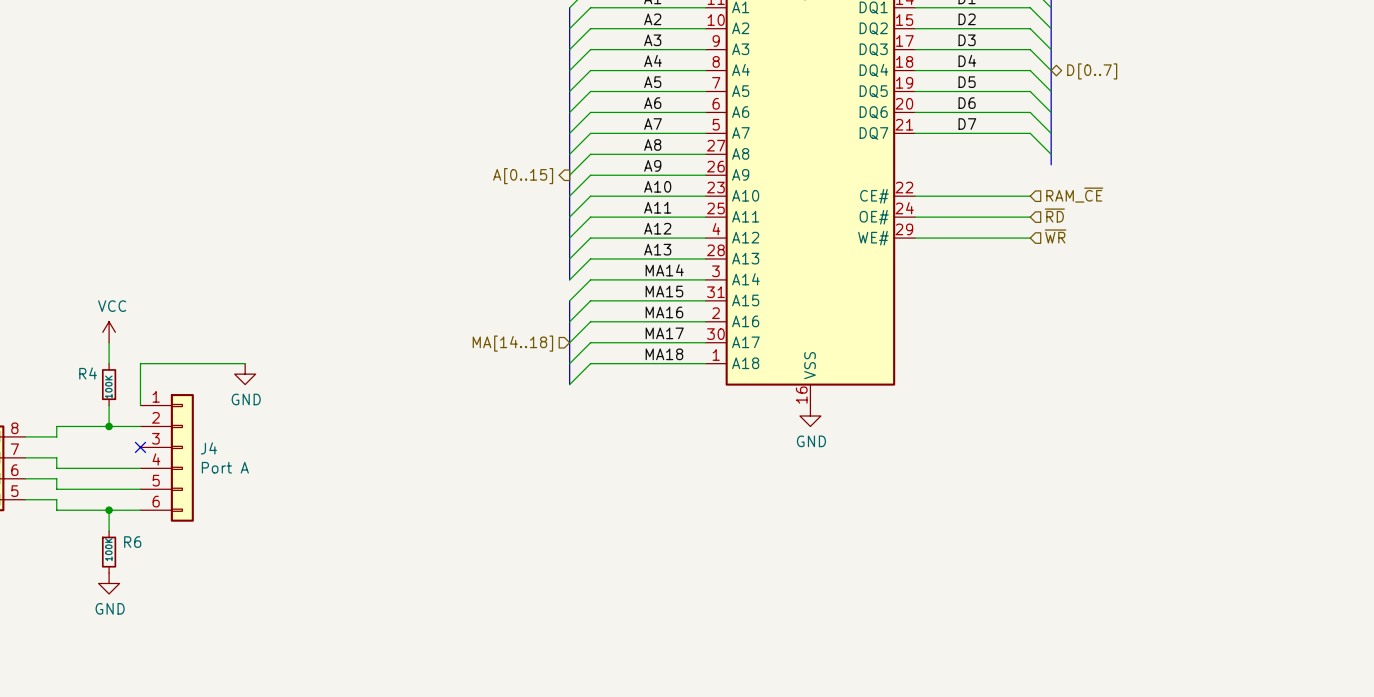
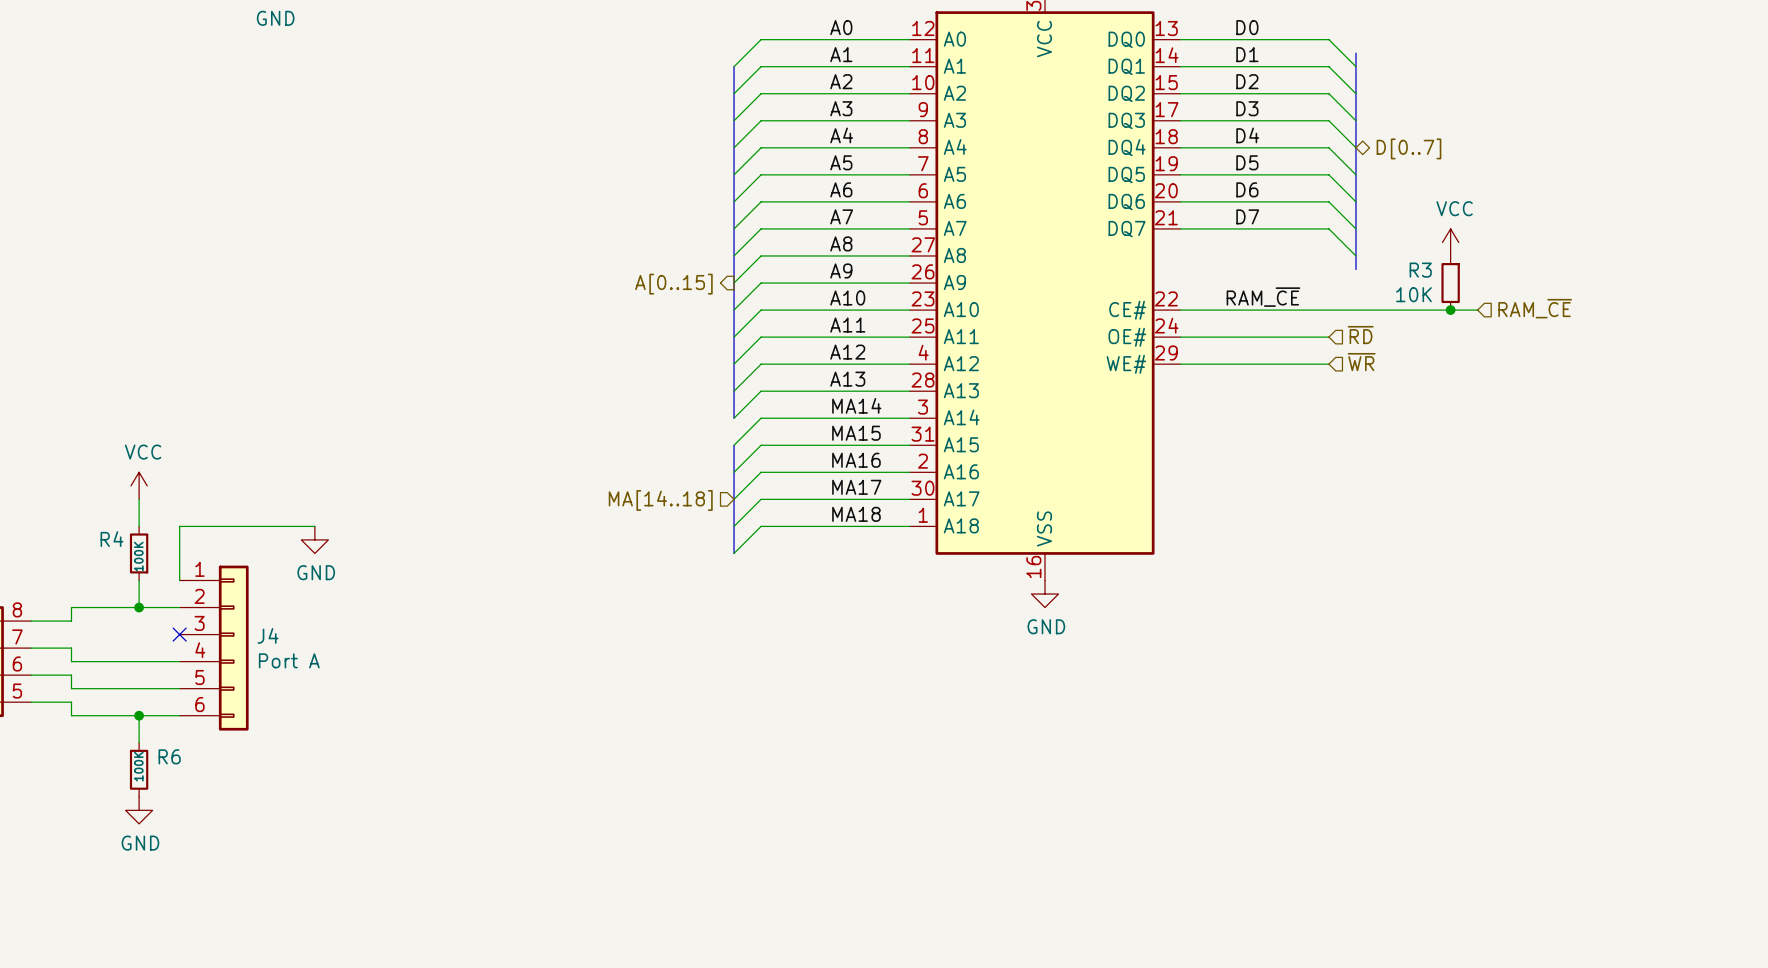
power symbol: none -> VCC (1450, 242)
R3: none -> 10K (1450, 283)
label: none -> RAM_~{CE} (1263, 297)
hierarchical label position: RAM_~{CE} (1074, 195) -> RAM_~{CE} (1535, 308)
wire: none -> (1328, 310) (1477, 310)
junction: none -> (1450, 310)

